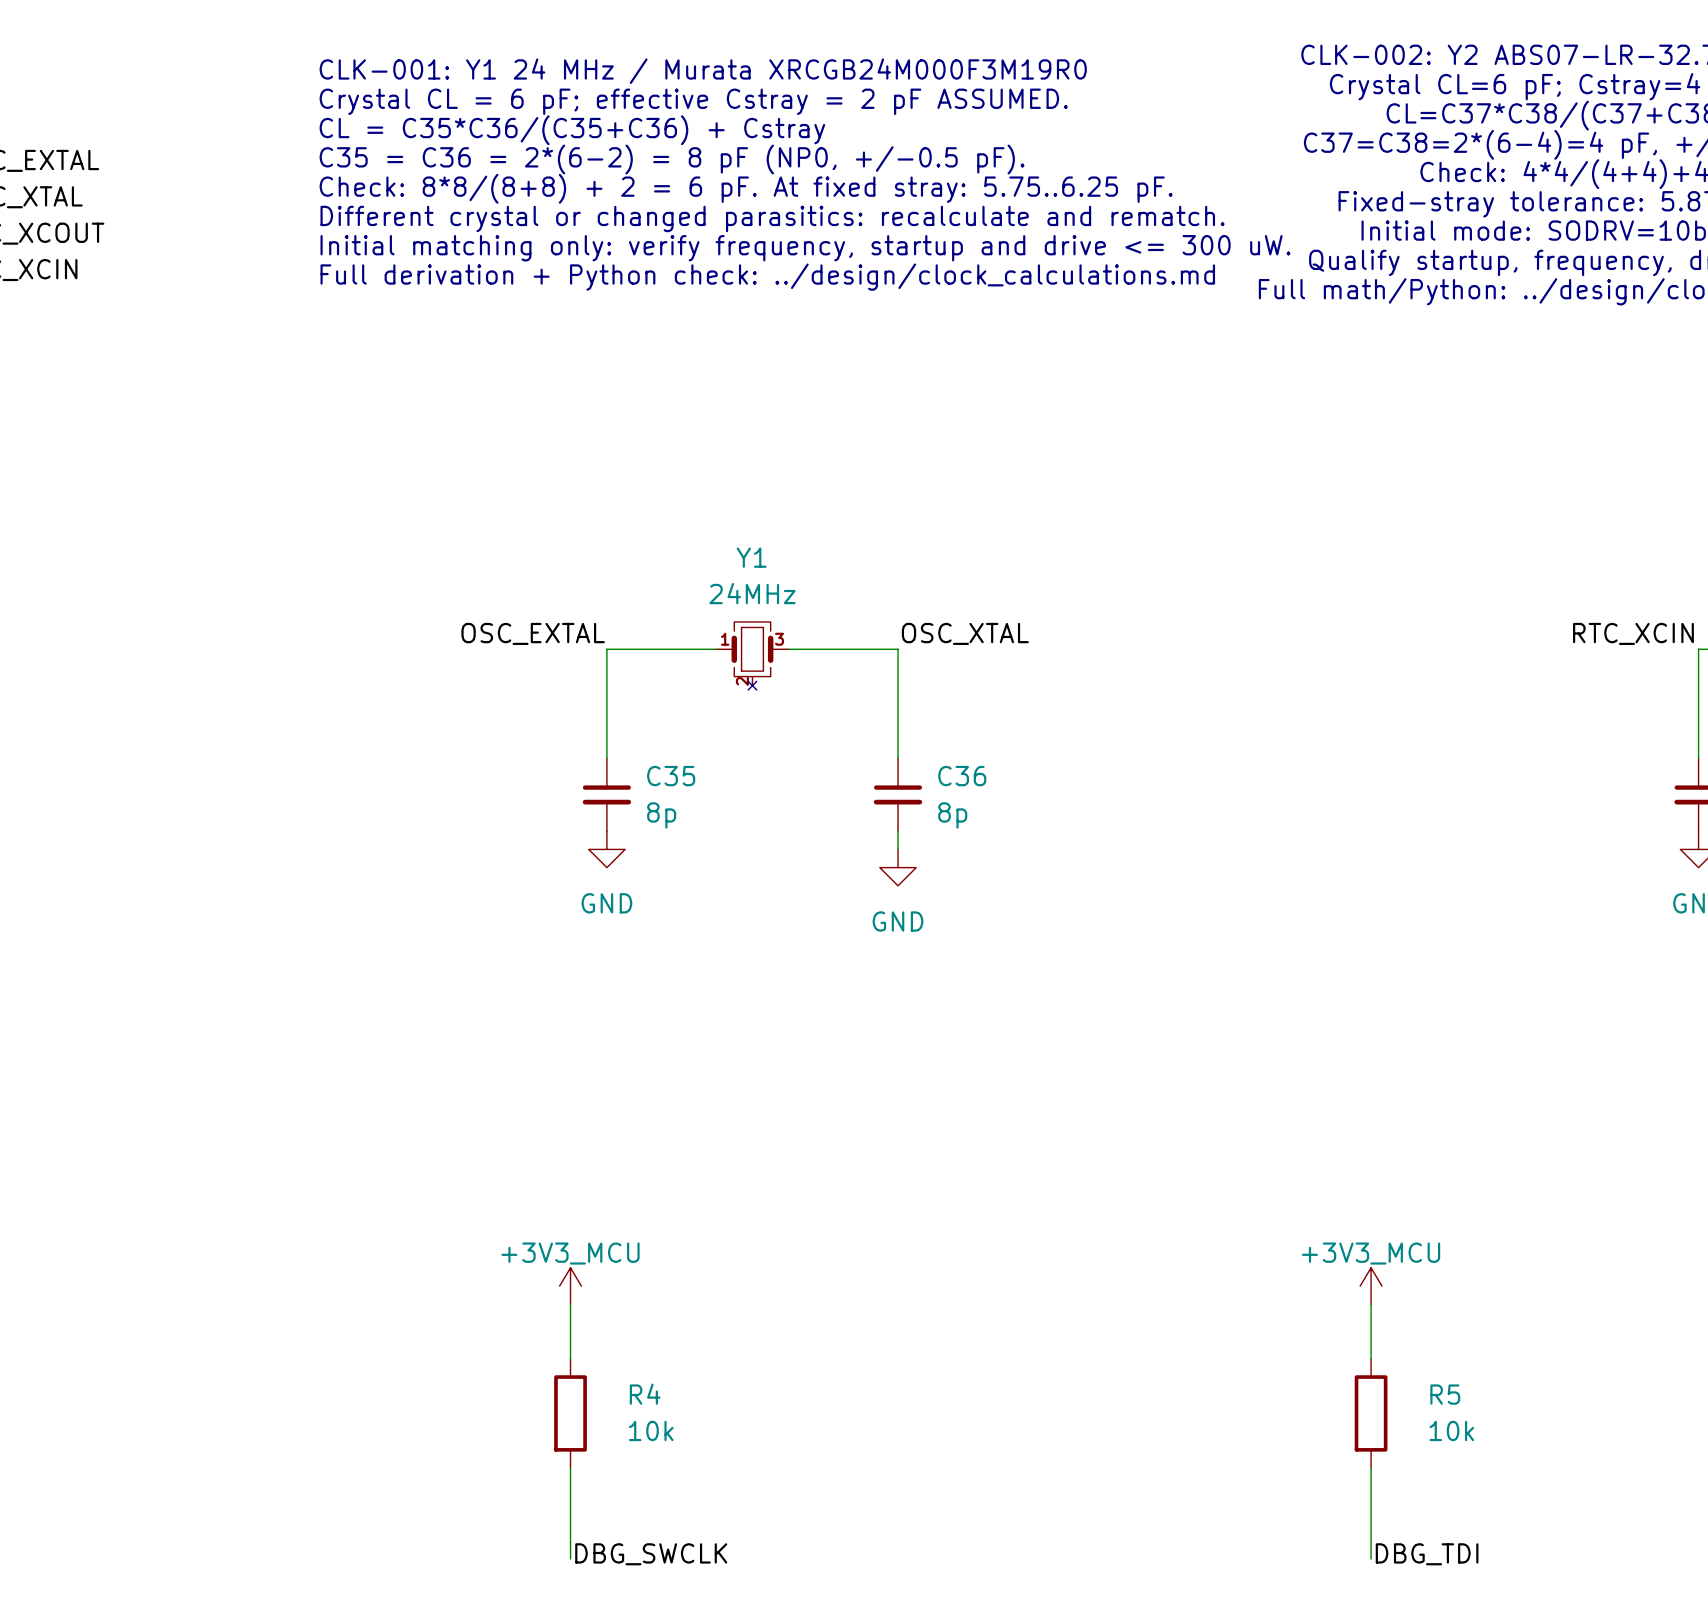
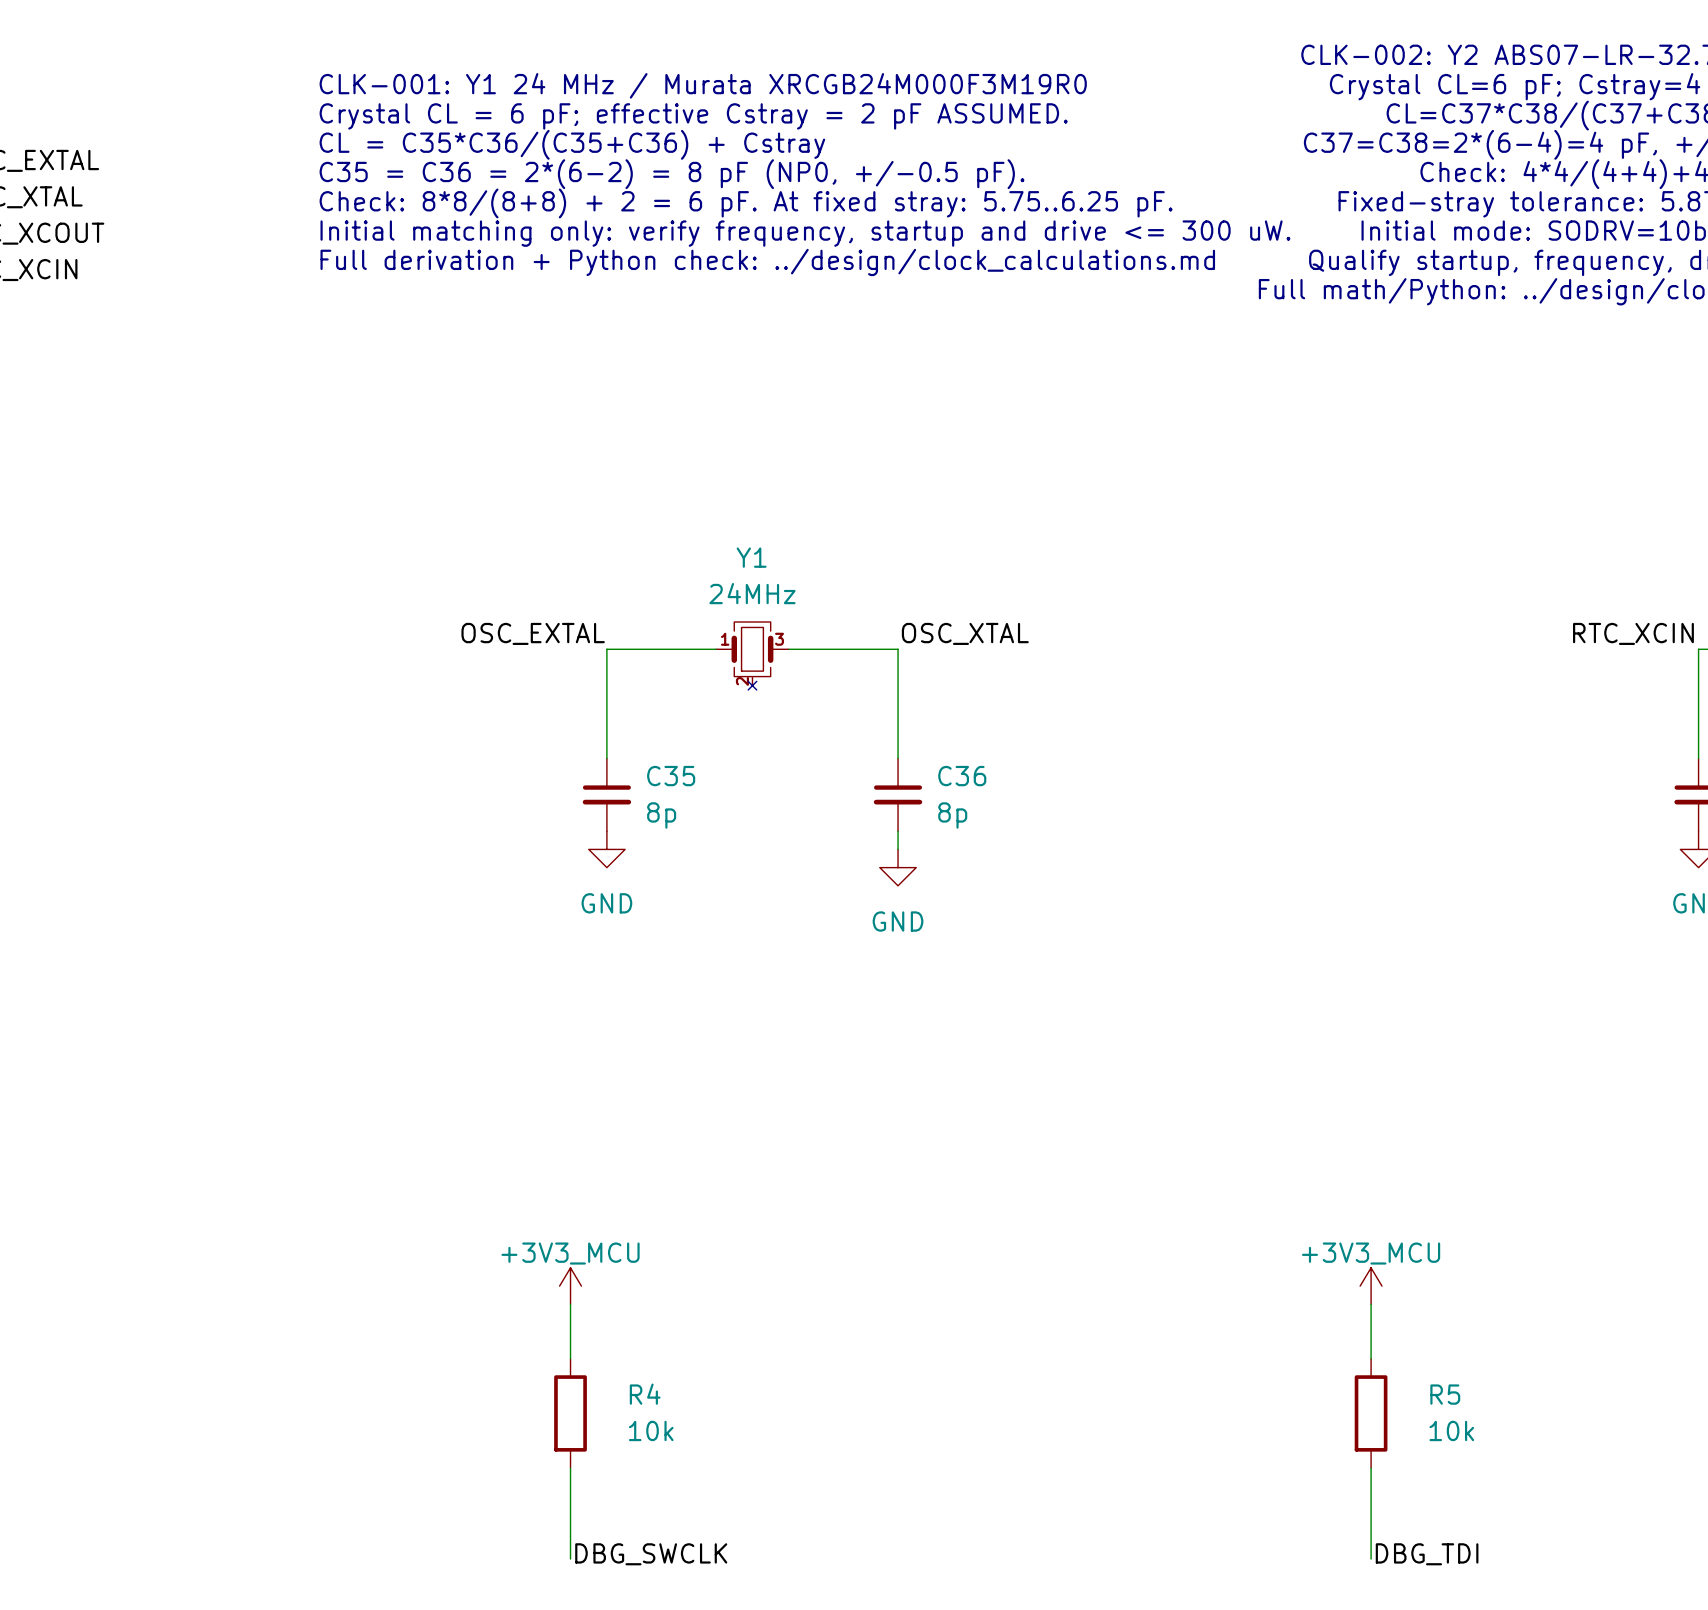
text position: CLK-001: Y1 24 MHz / Murata XRCGB24M000F3M19R0 (703, 71) -> CLK-001: Y1 24 MHz / Murata XRCGB24M000F3M19R0 (703, 85)
text position: Crystal CL = 6 pF; effective Cstray = 2 pF ASSUMED. (693, 101) -> Crystal CL = 6 pF; effective Cstray = 2 pF ASSUMED. (693, 116)
text position: CL = C35*C36/(C35+C36) + Cstray (572, 130) -> CL = C35*C36/(C35+C36) + Cstray (572, 144)
text position: C35 = C36 = 2*(6-2) = 8 pF (NP0, +/-0.5 pF). (672, 159) -> C35 = C36 = 2*(6-2) = 8 pF (NP0, +/-0.5 pF). (672, 174)
text position: Check: 8*8/(8+8) + 2 = 6 pF. At fixed stray: 5.75..6.25 pF. (746, 188) -> Check: 8*8/(8+8) + 2 = 6 pF. At fixed stray: 5.75..6.25 pF. (746, 203)
text: Different crystal or changed parasitics: recalculate and rematch. (772, 218) -> none
text position: Initial matching only: verify frequency, startup and drive <= 300 uW. (805, 248) -> Initial matching only: verify frequency, startup and drive <= 300 uW. (805, 233)
text position: Full derivation + Python check: ../design/clock_calculations.md (767, 277) -> Full derivation + Python check: ../design/clock_calculations.md (767, 262)

